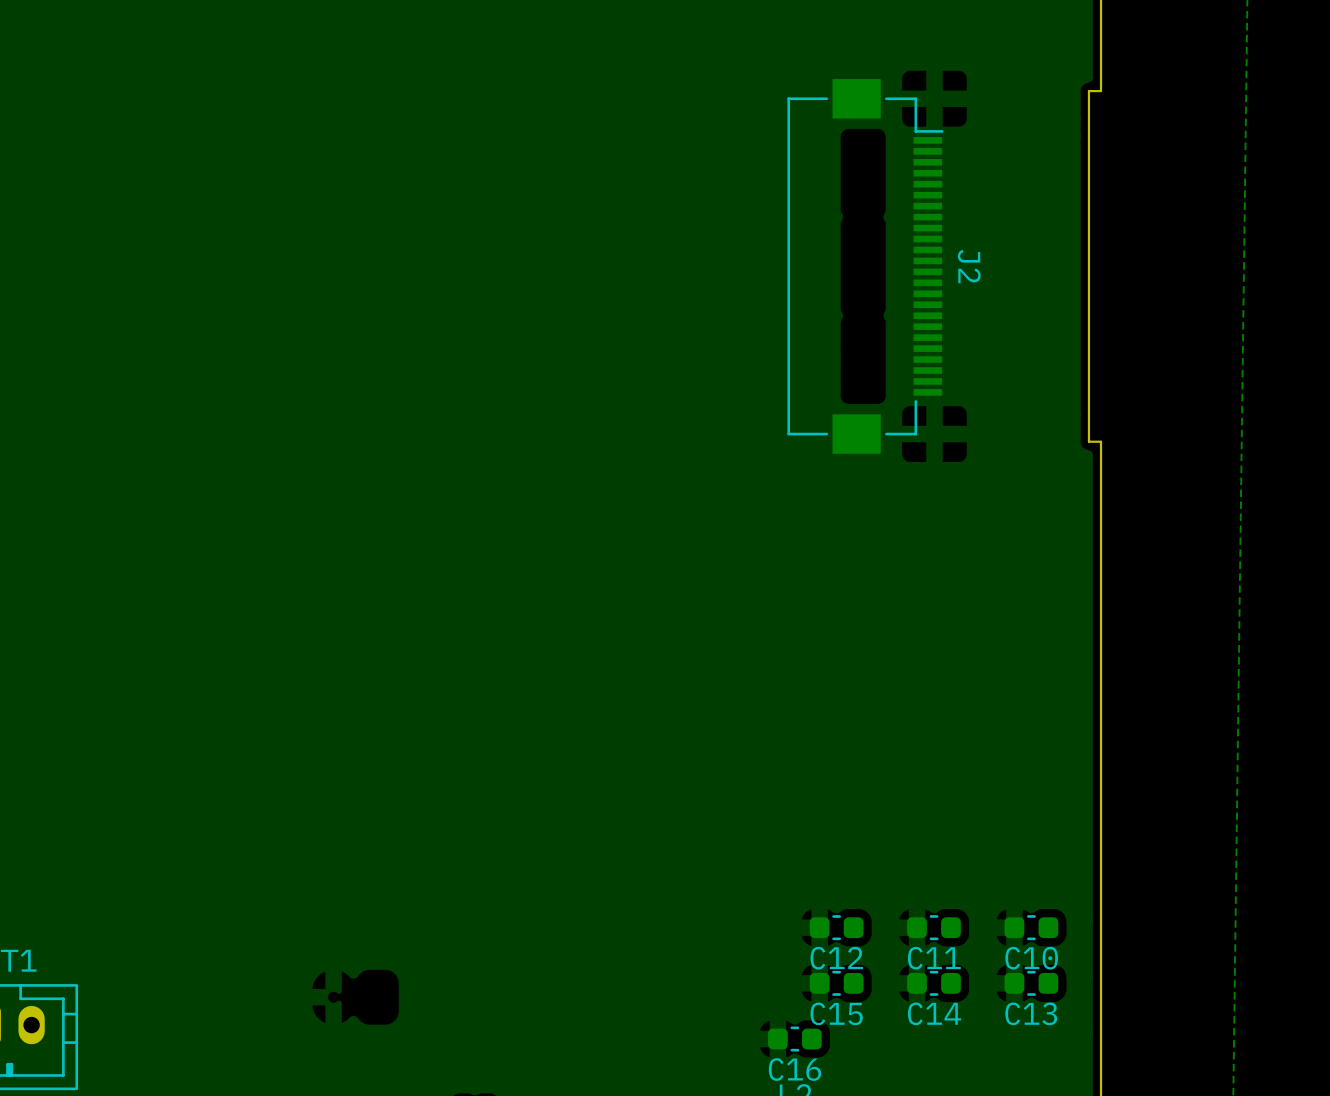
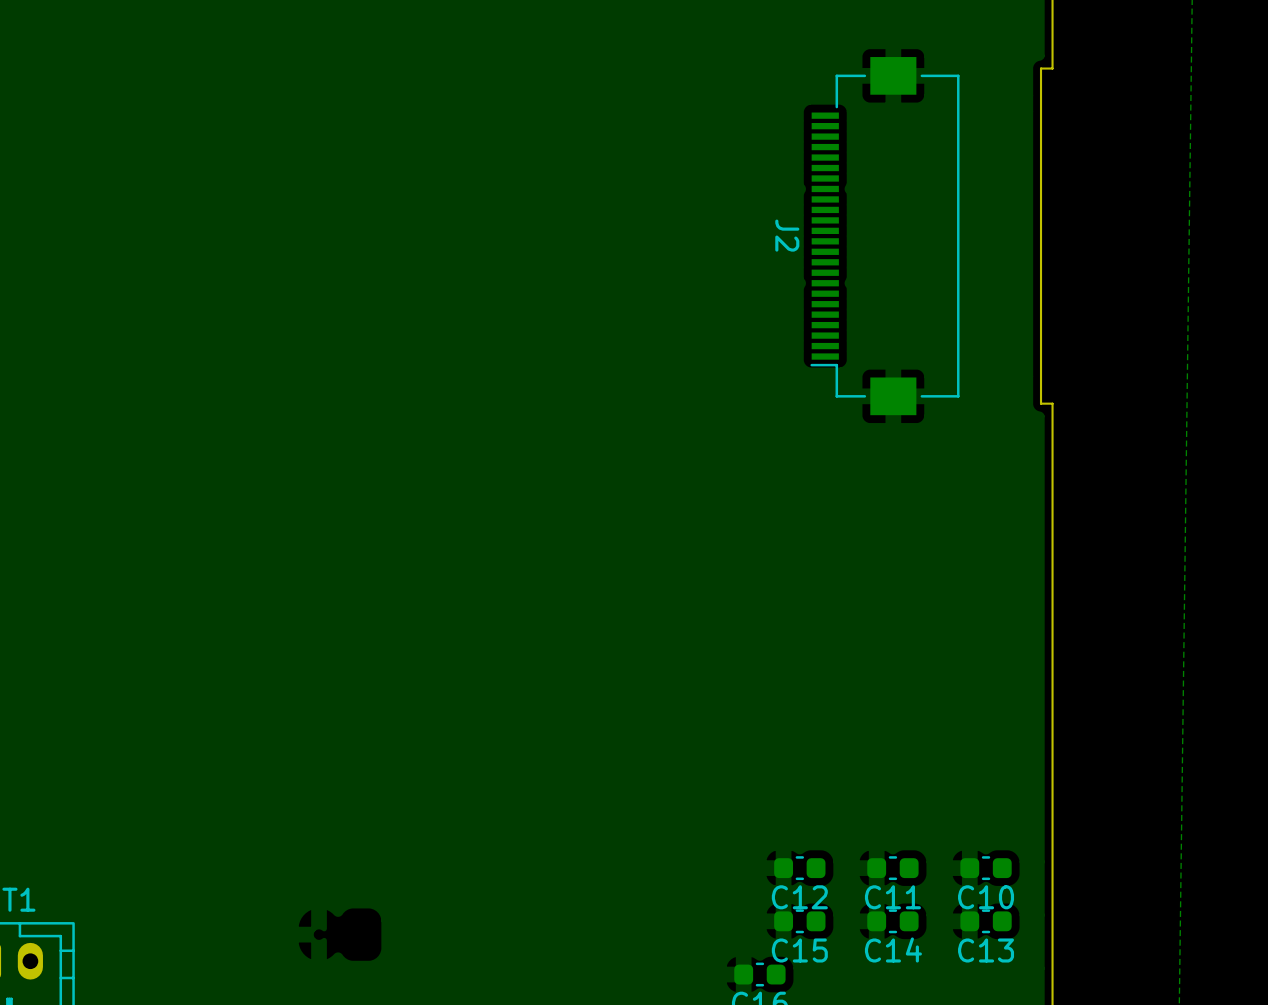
J2 rotation: 0° (865, 266) -> 180° (884, 236)

